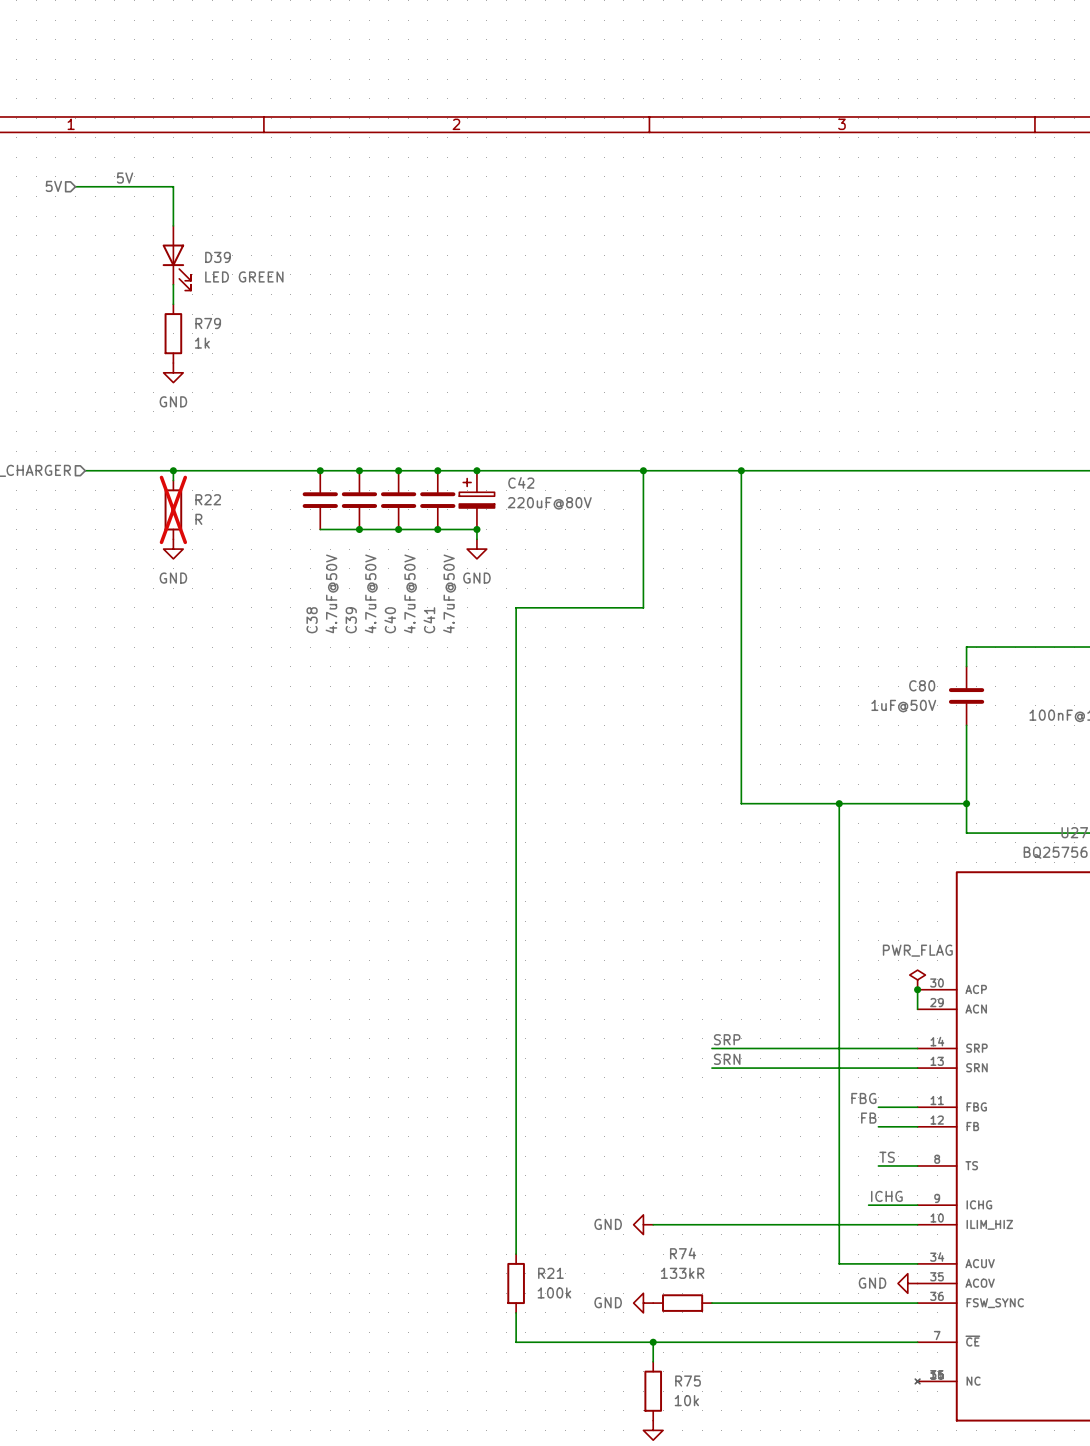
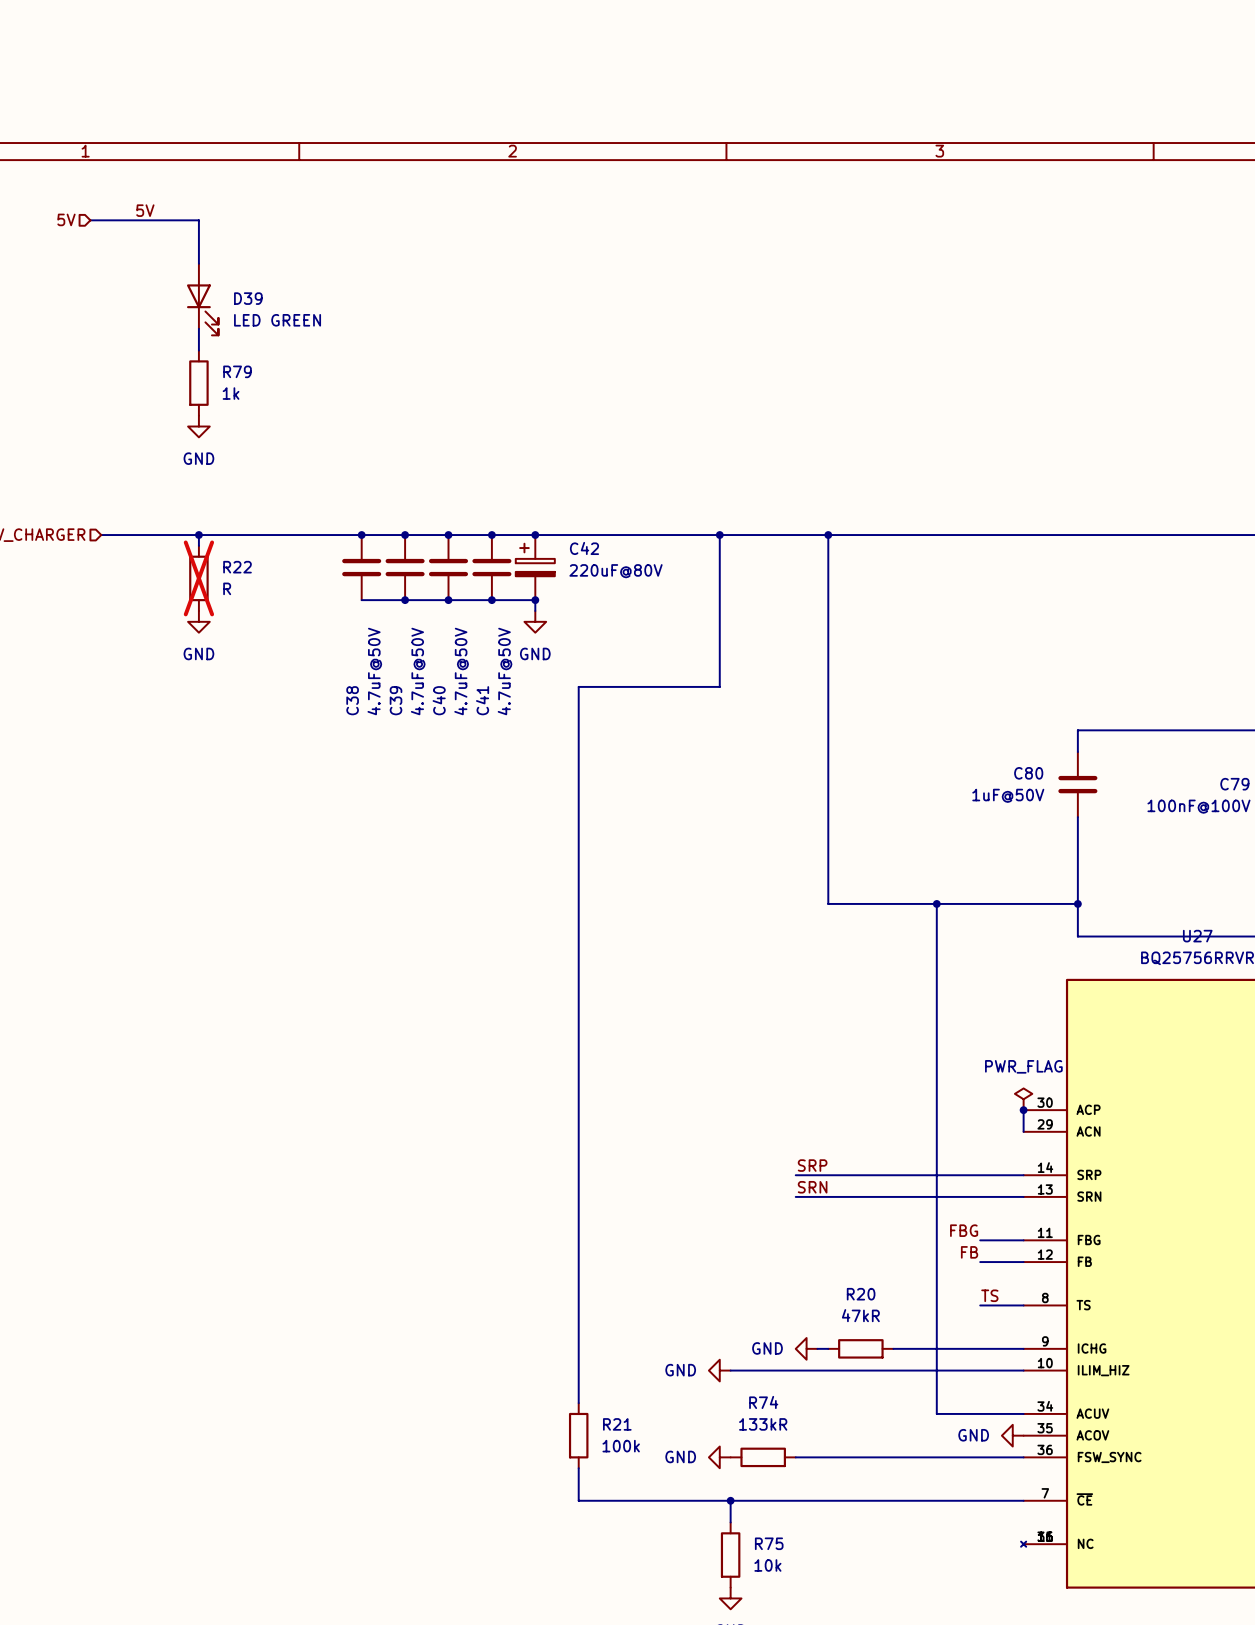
label: ICHG (886, 1196) -> none
power symbol: none -> GND (806, 1348)
wire: none -> (817, 1348) (828, 1348)
R20: none -> 47kR (860, 1348)
wire: none -> (893, 1348) (969, 1348)

